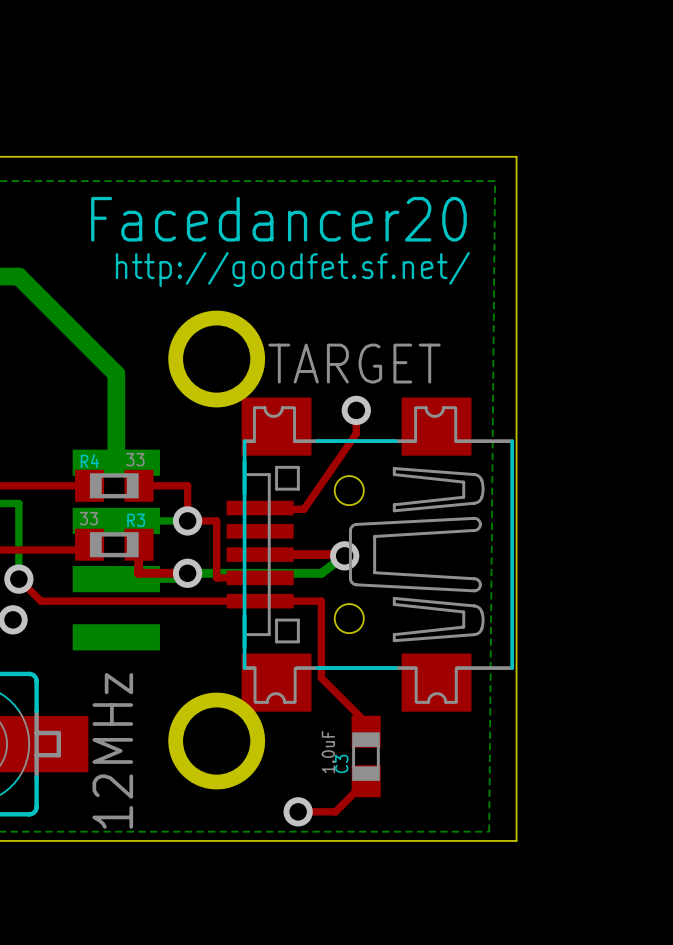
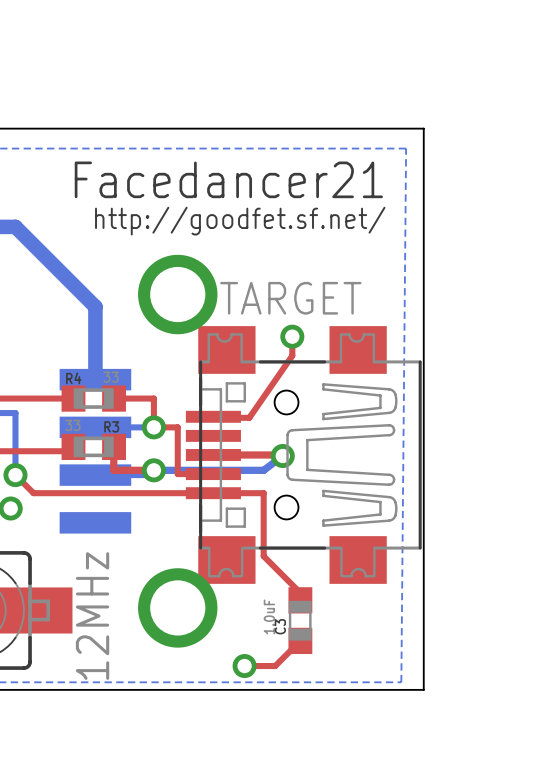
text: Facedancer20 (278, 219) -> Facedancer21 (228, 179)

